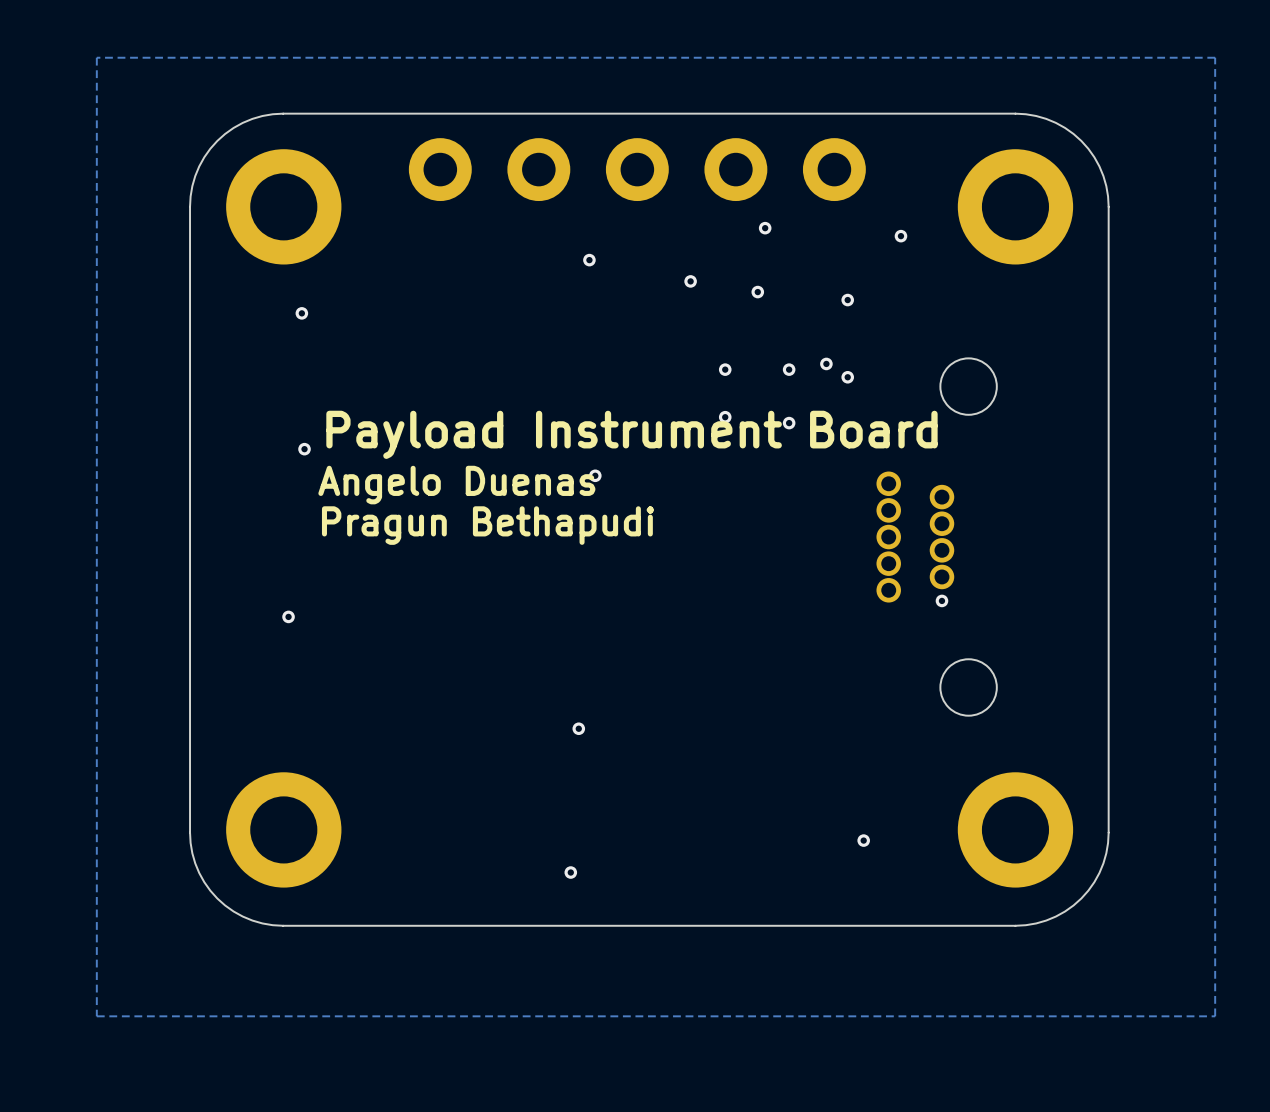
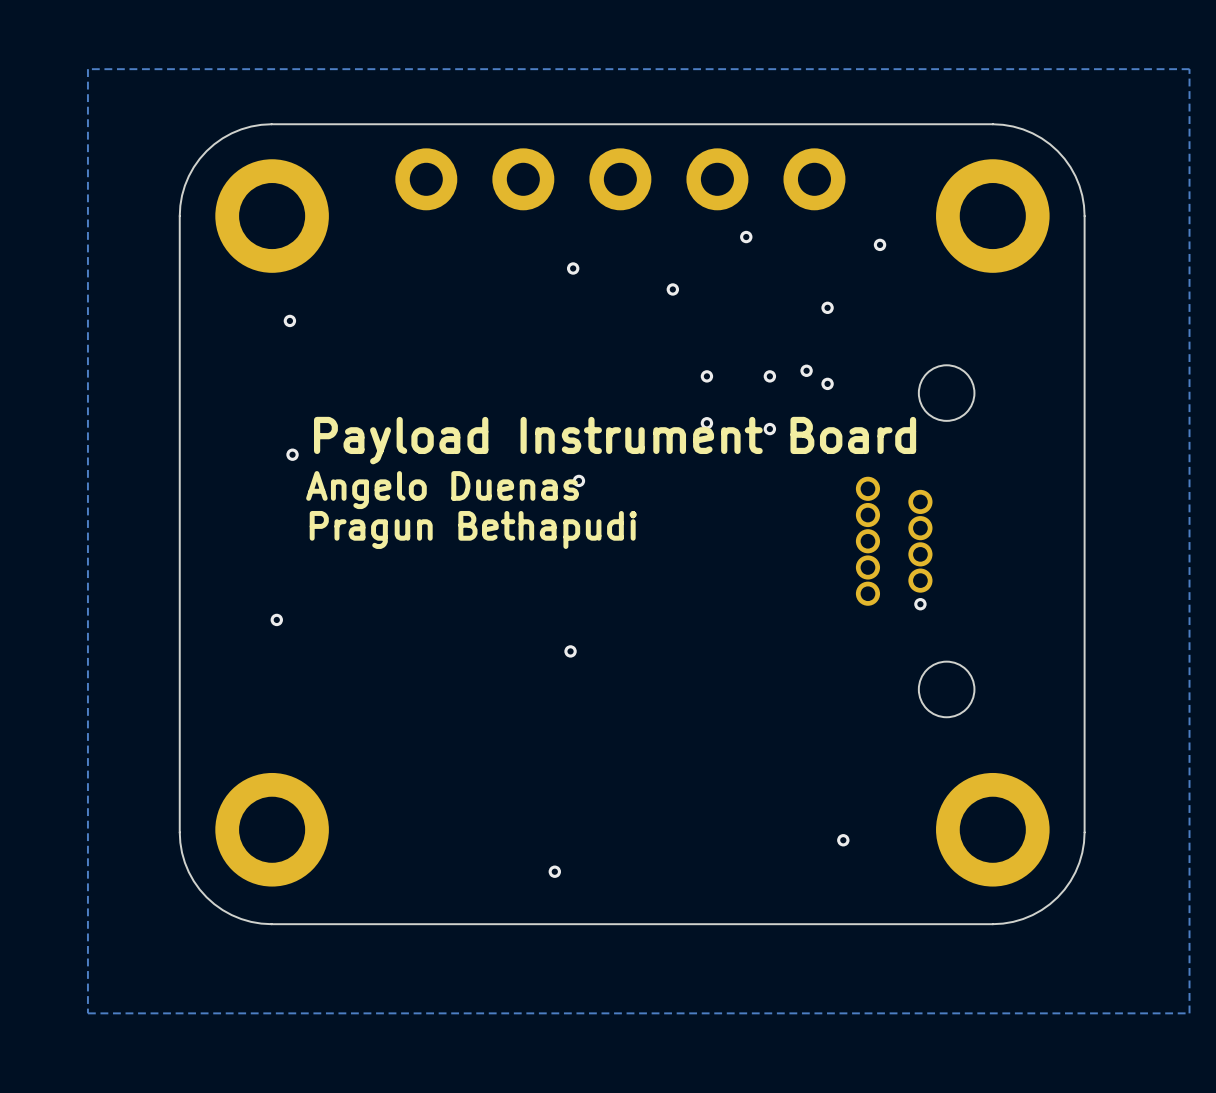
via: (757, 292) -> none
via position: (578, 728) -> (570, 651)

